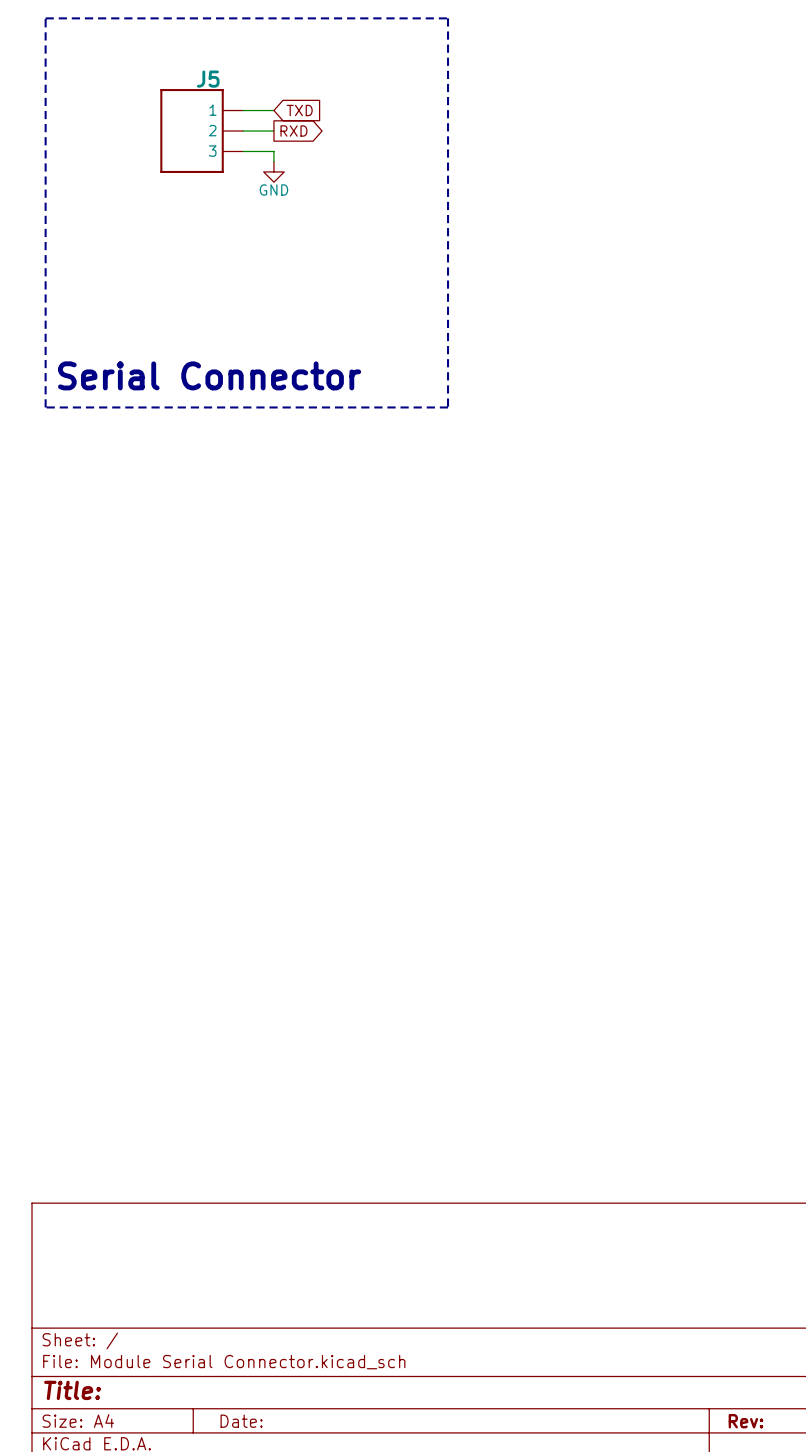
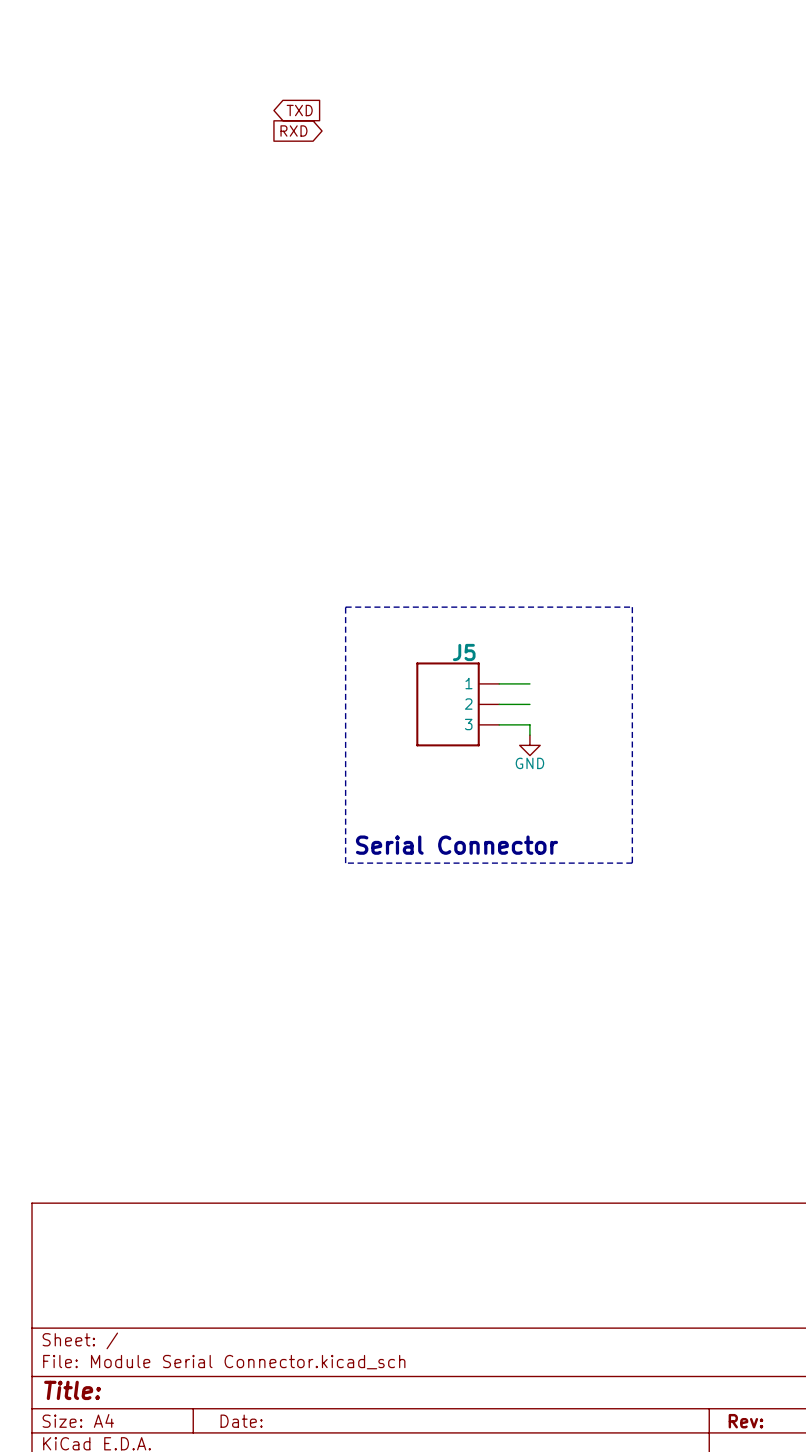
line: (45, 18) (448, 18) (448, 407) (45, 407) (45, 18) -> none
wire: (243, 110) (273, 110) -> none
J5 position: (201, 131) -> (457, 704)
wire: (243, 131) (273, 131) -> none
wire: (243, 151) (273, 151) (273, 161) -> none
power symbol: GND (273, 171) -> none
text: Serial Connector (209, 375) -> none
line: none -> (345, 607) (632, 607) (632, 863) (345, 863) (345, 607)
wire: none -> (499, 683) (529, 683)
wire: none -> (499, 704) (529, 704)
wire: none -> (499, 724) (529, 724) (529, 735)
power symbol: none -> GND (529, 745)
text: none -> Serial Connector (456, 845)

